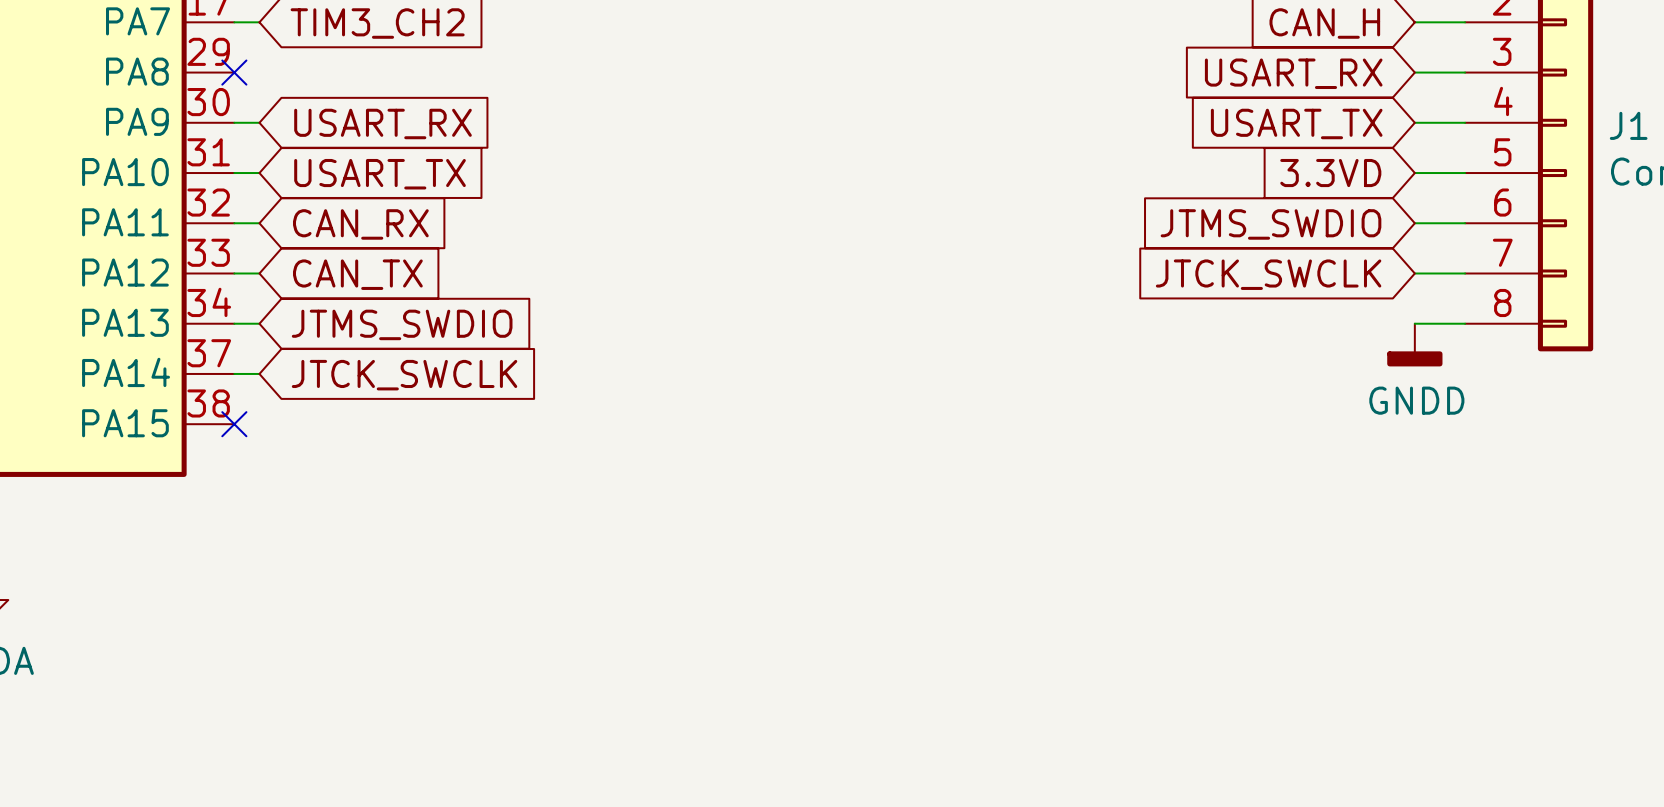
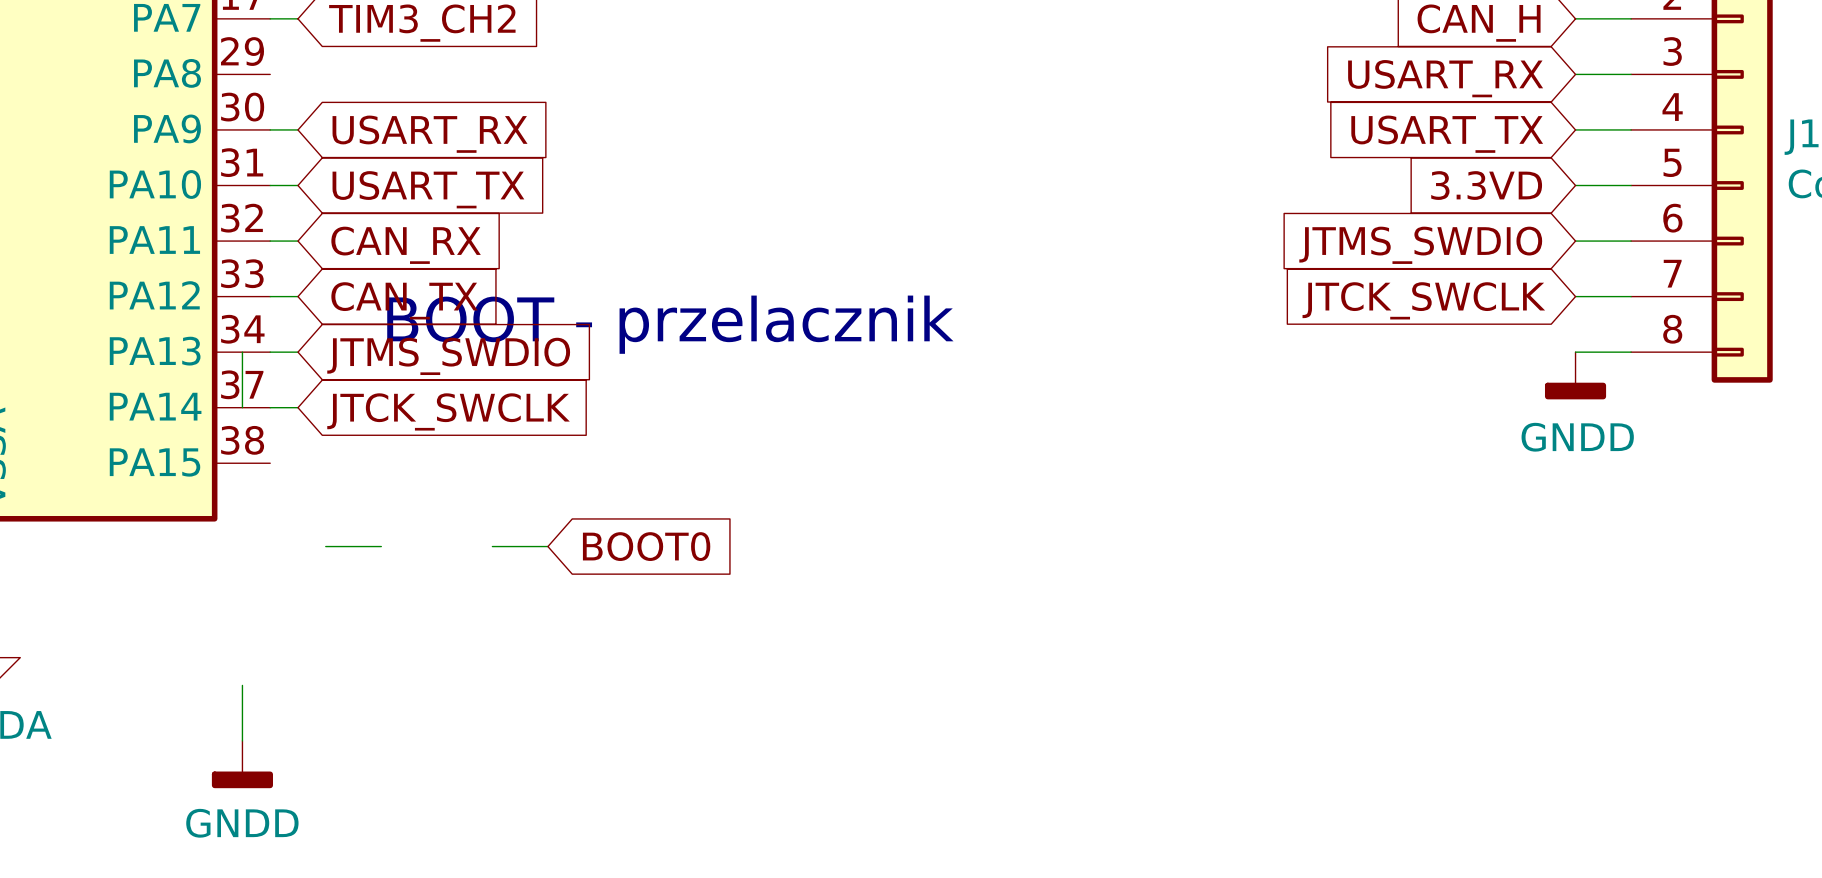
no-connect mark: (234, 72) -> none
text: none -> BOOT - przelacznik (670, 324)
wire: none -> (242, 352) (242, 407)
no-connect mark: (234, 424) -> none
wire: none -> (325, 546) (381, 546)
wire: none -> (492, 546) (547, 546)
global label: none -> BOOT0 (646, 546)
wire: none -> (242, 685) (242, 740)
power symbol: none -> GNDD (242, 764)

